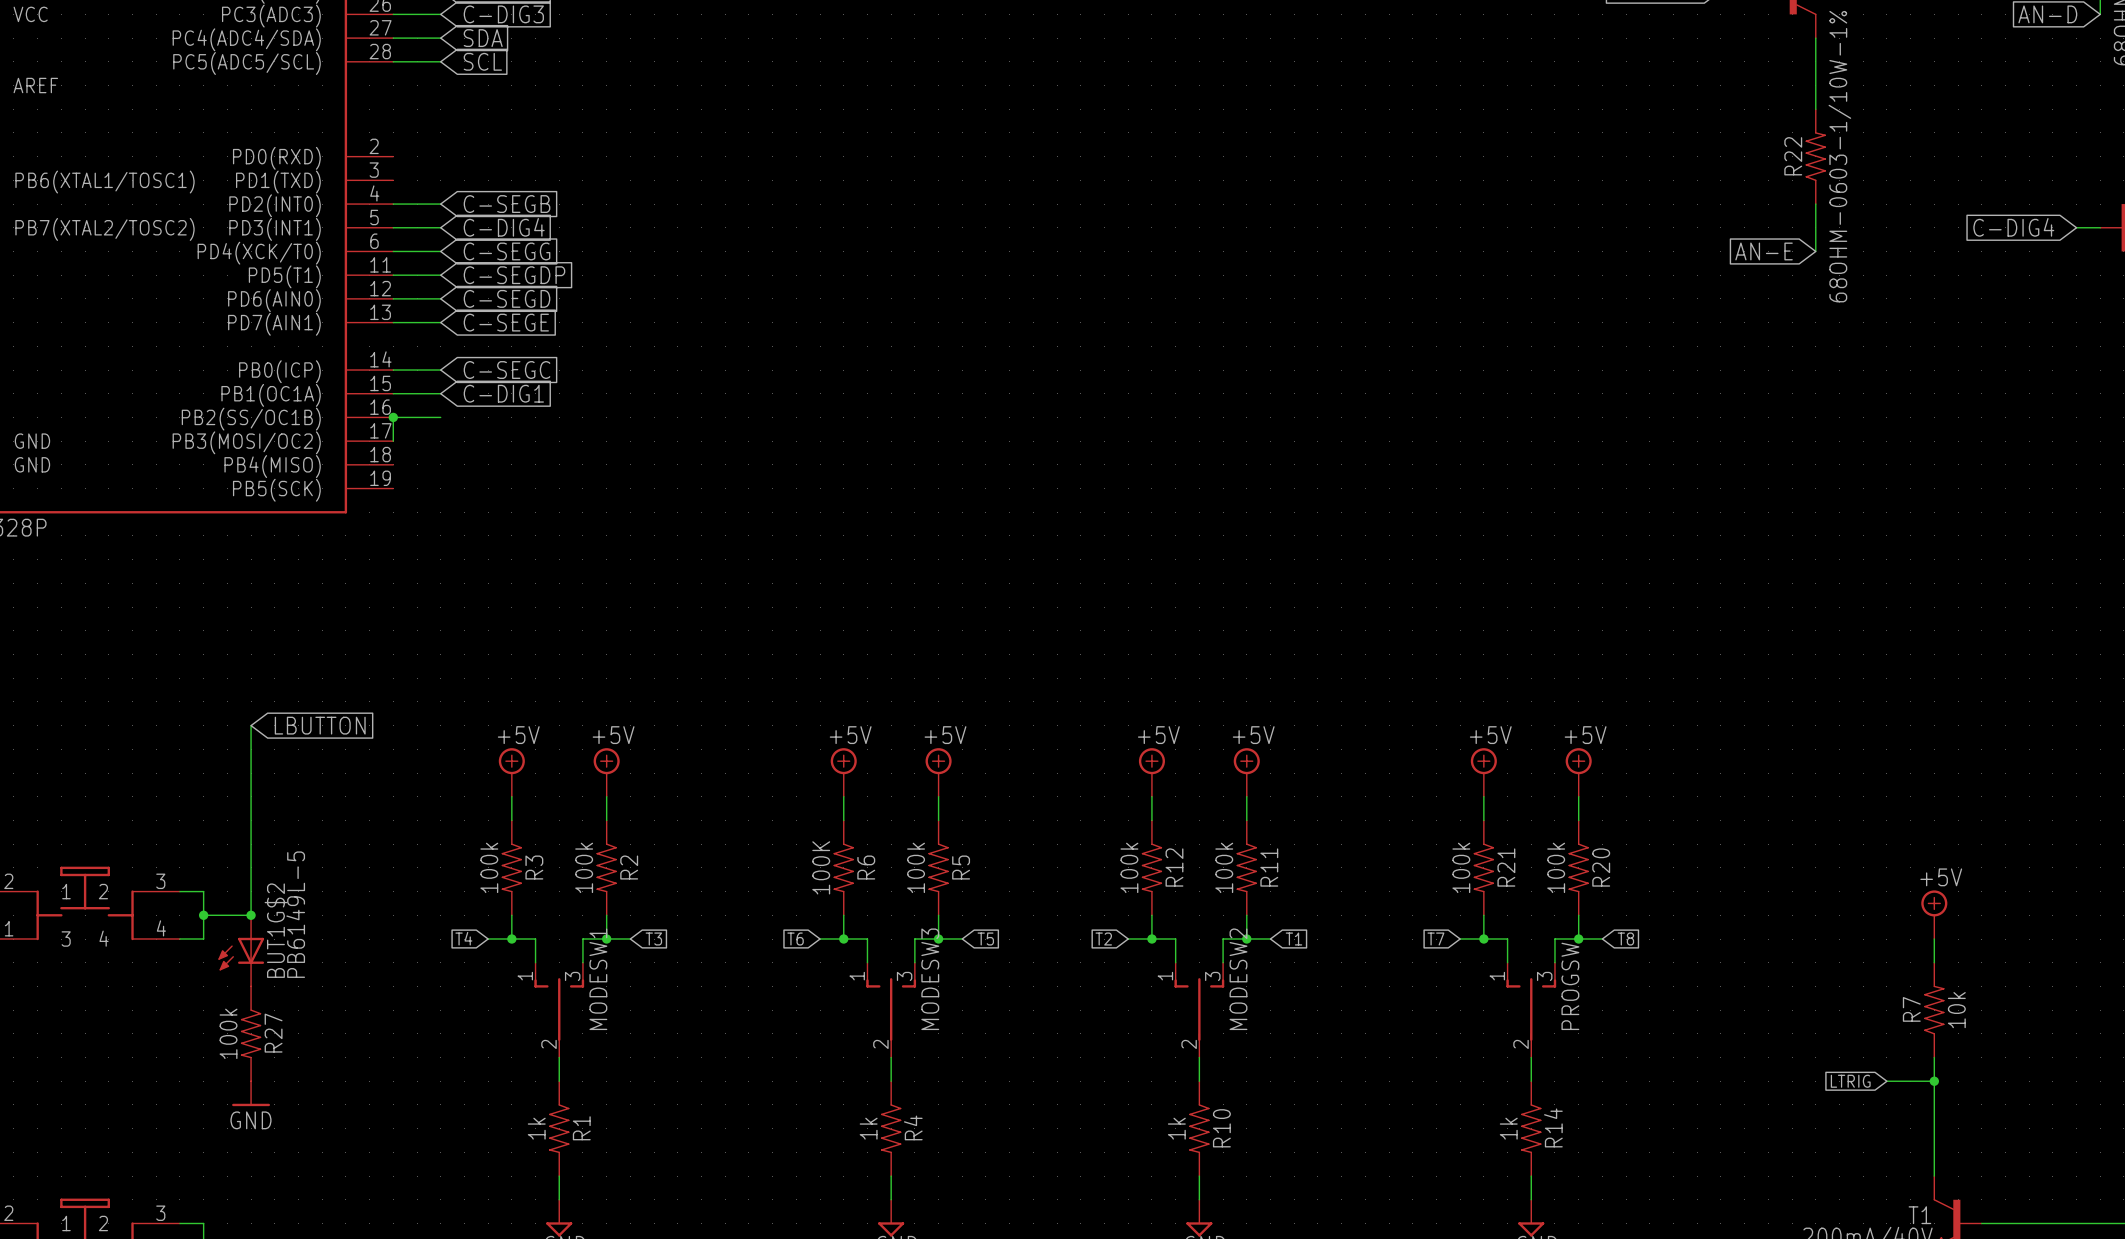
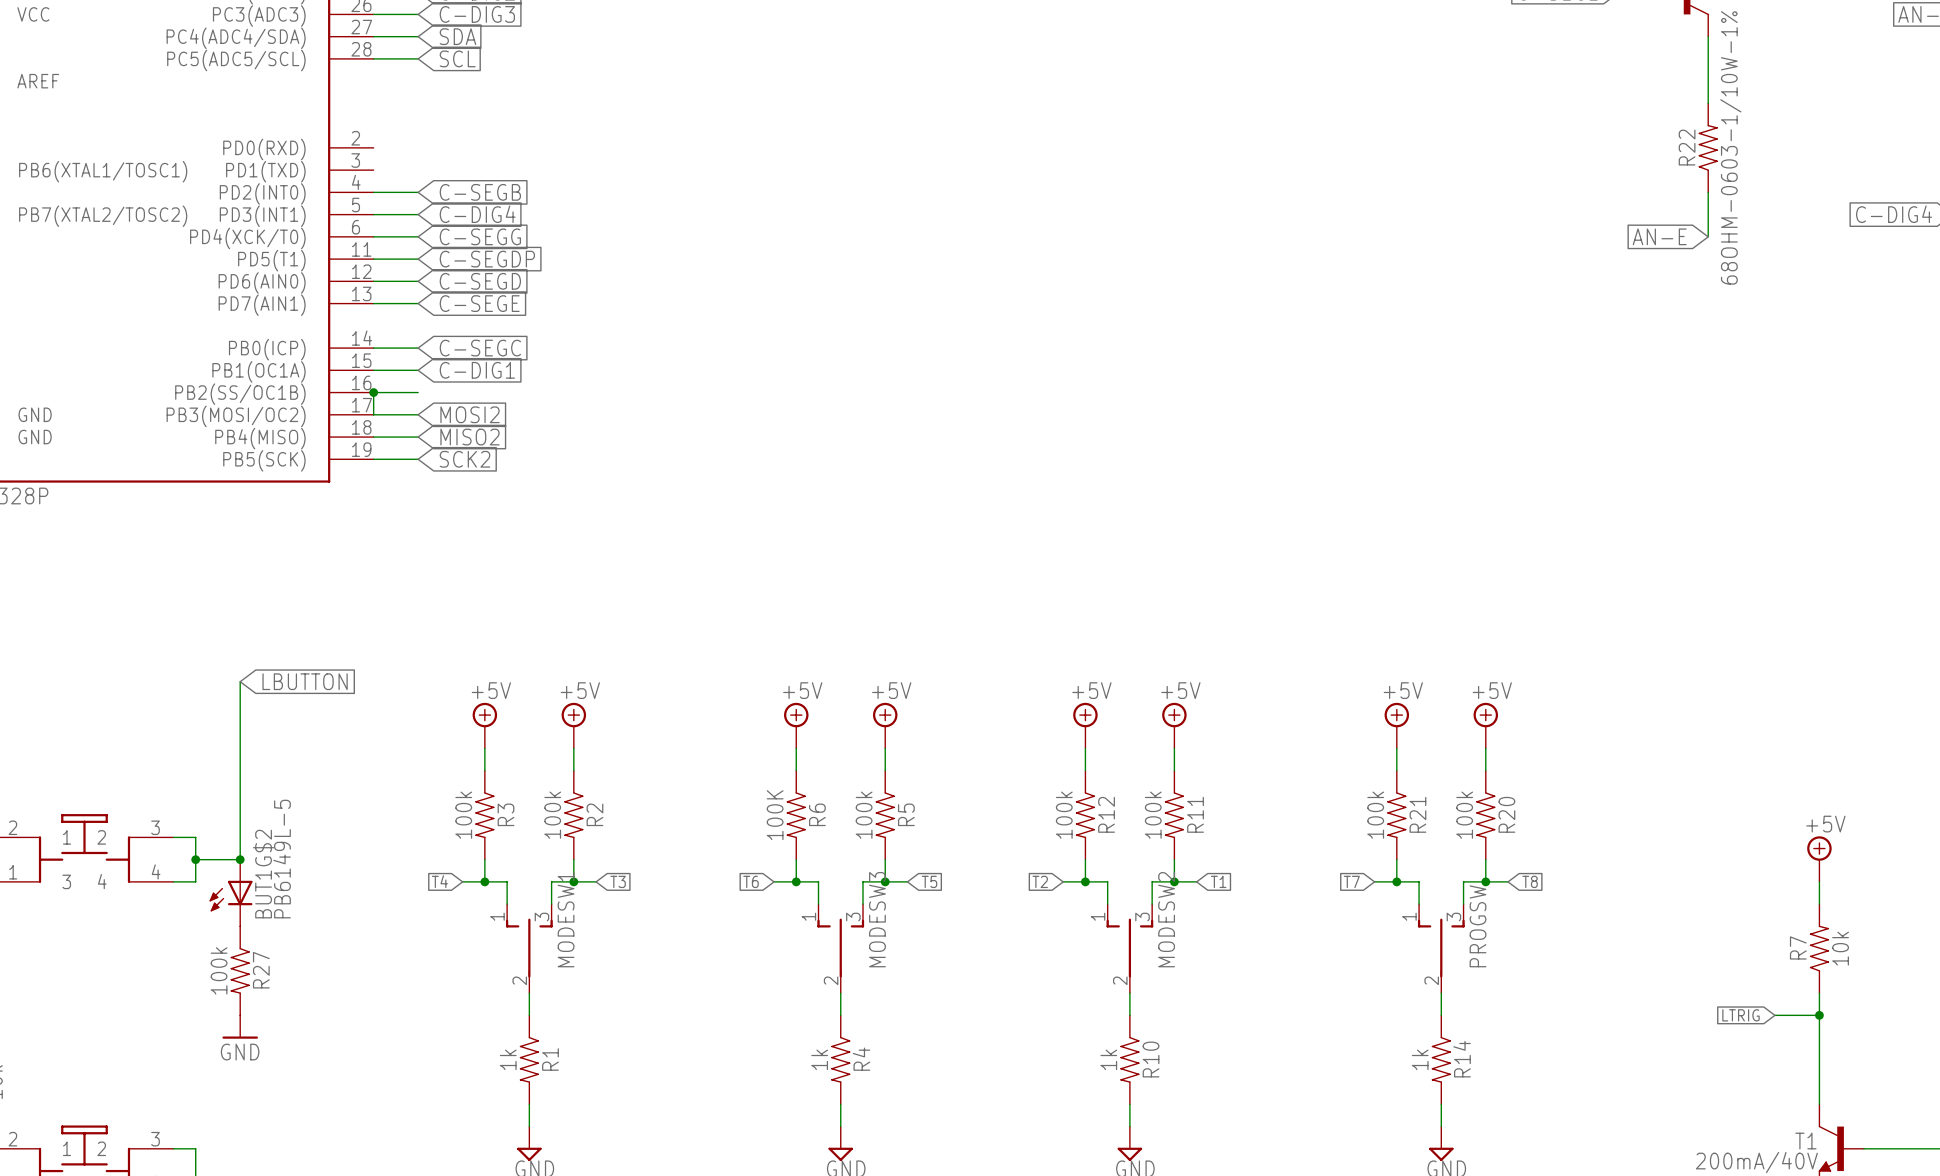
wire: none -> (373, 414) (418, 414)
global label: none -> MOSI2 (470, 414)
wire: none -> (373, 437) (418, 437)
global label: none -> MISO2 (470, 437)
wire: none -> (373, 459) (418, 459)
global label: none -> SCK2 (465, 459)

